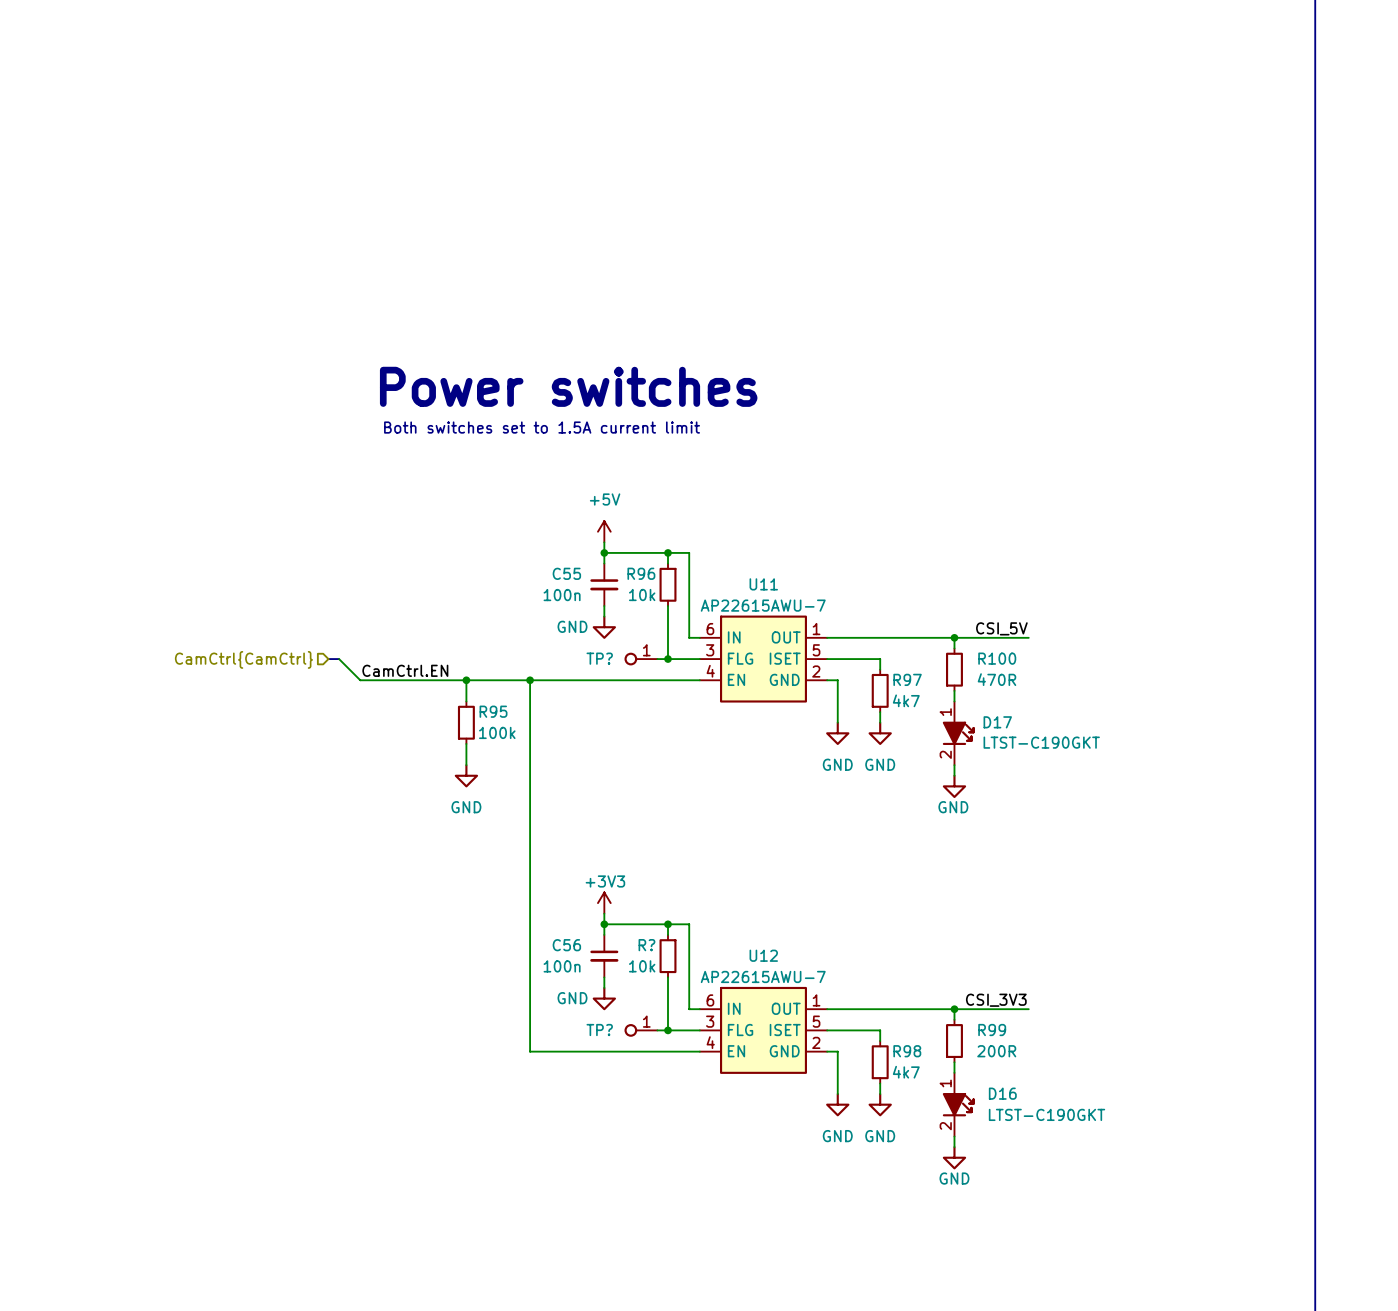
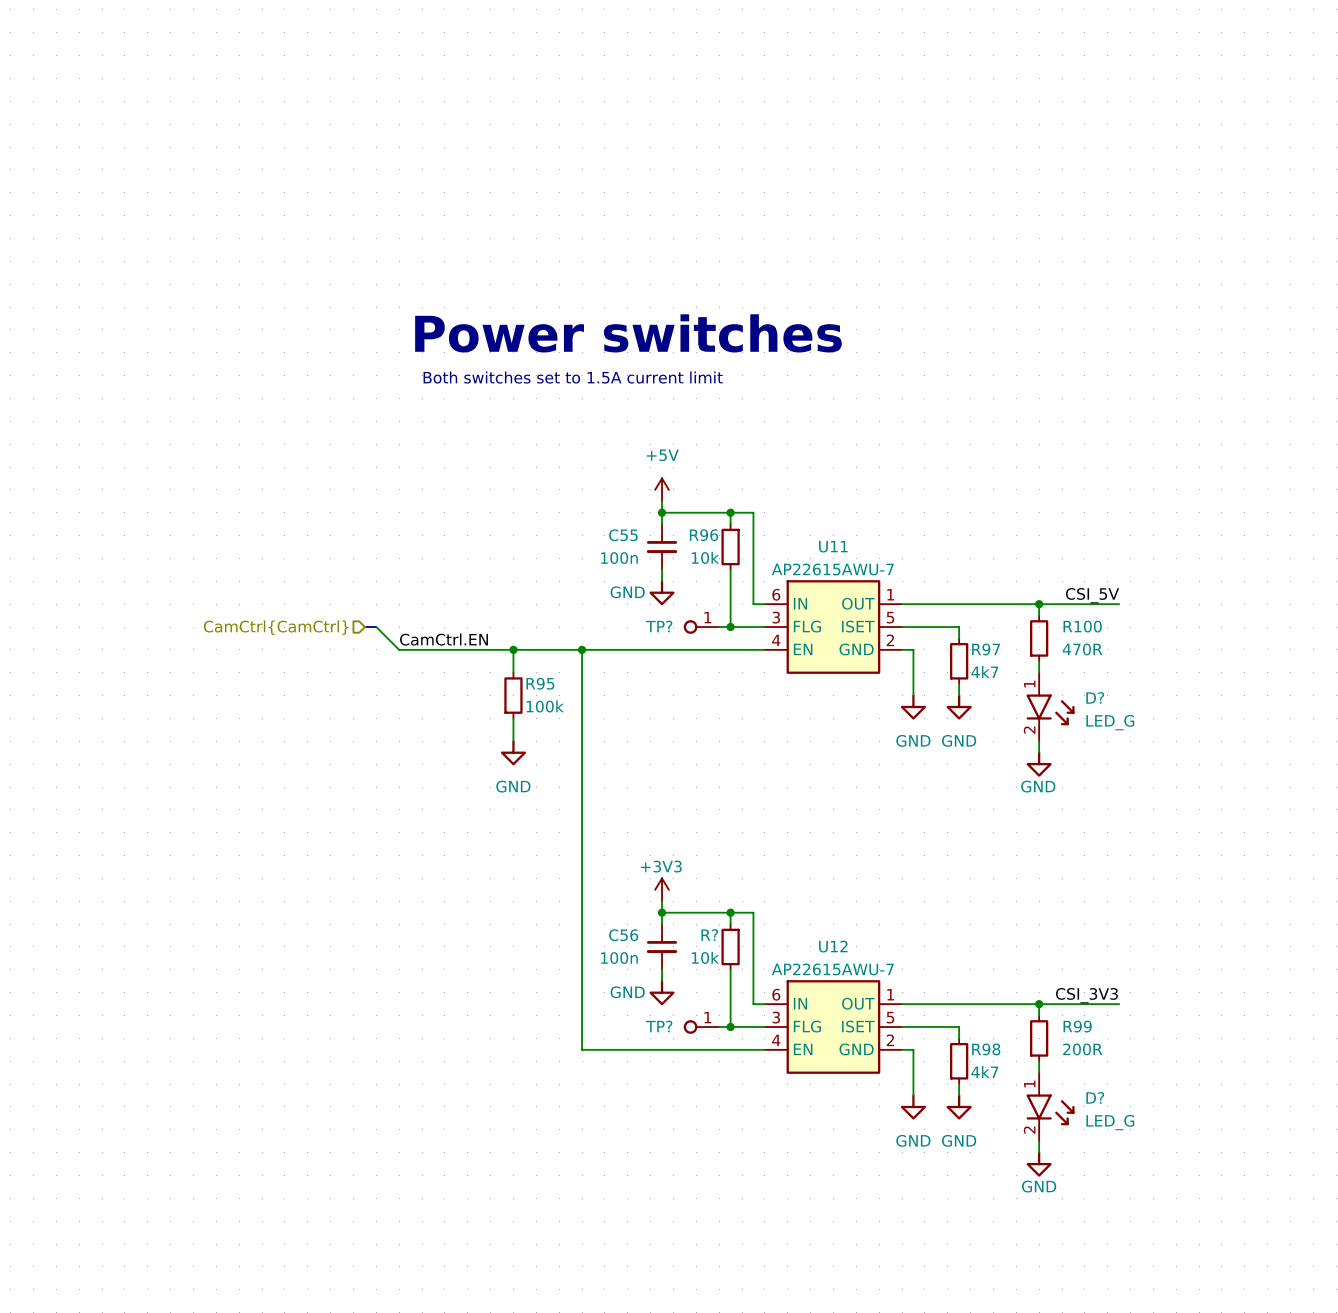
D17: (958, 733) -> none
D?: none -> LED_G (1050, 707)
D16: (958, 1104) -> none
D?: none -> LED_G (1050, 1106)

